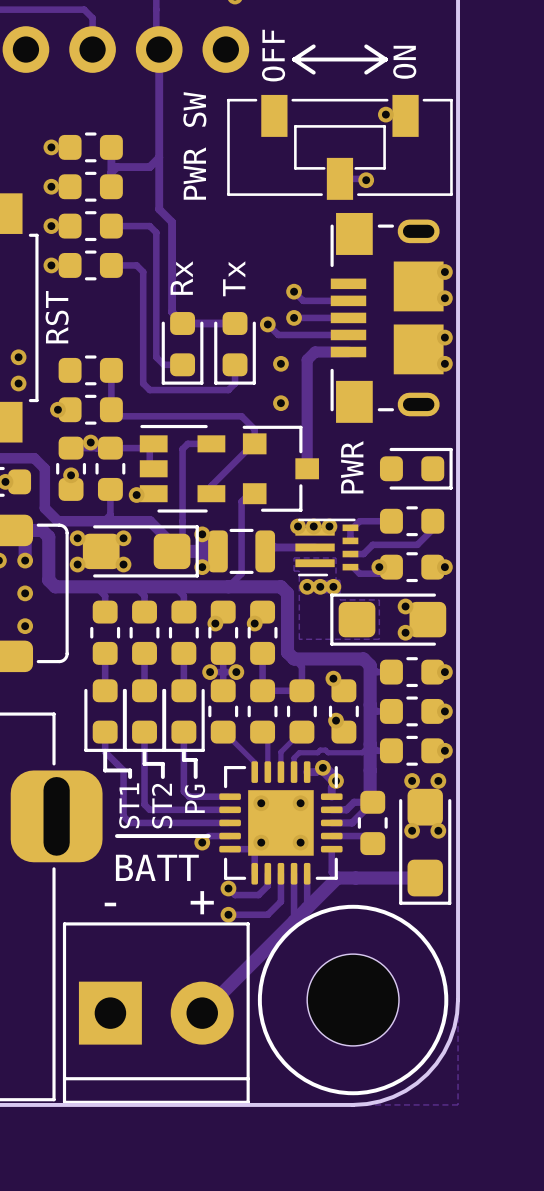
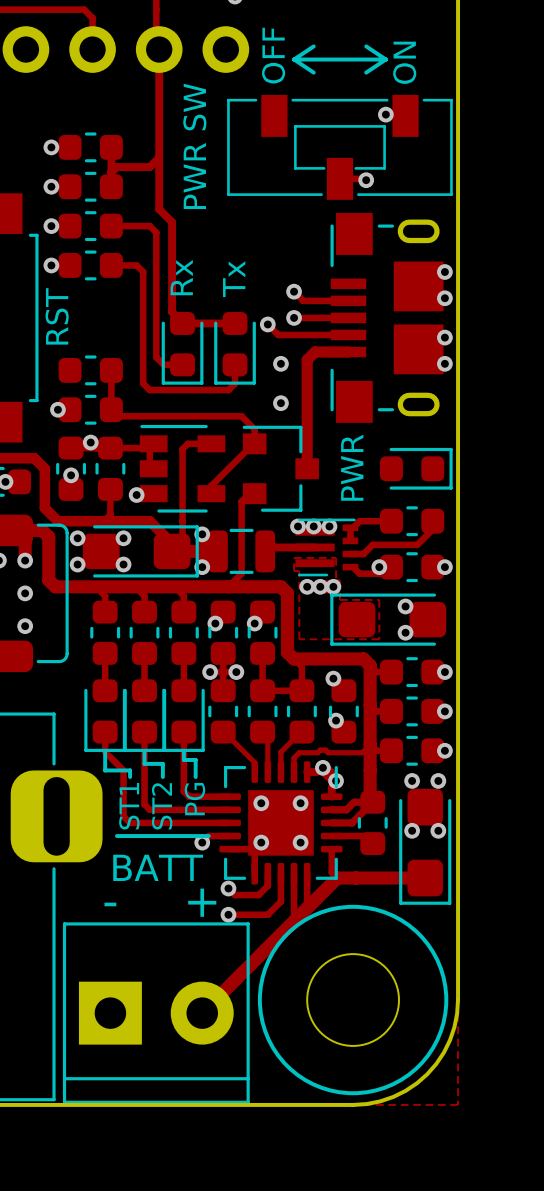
via: (18, 357) -> none
via: (18, 383) -> none

